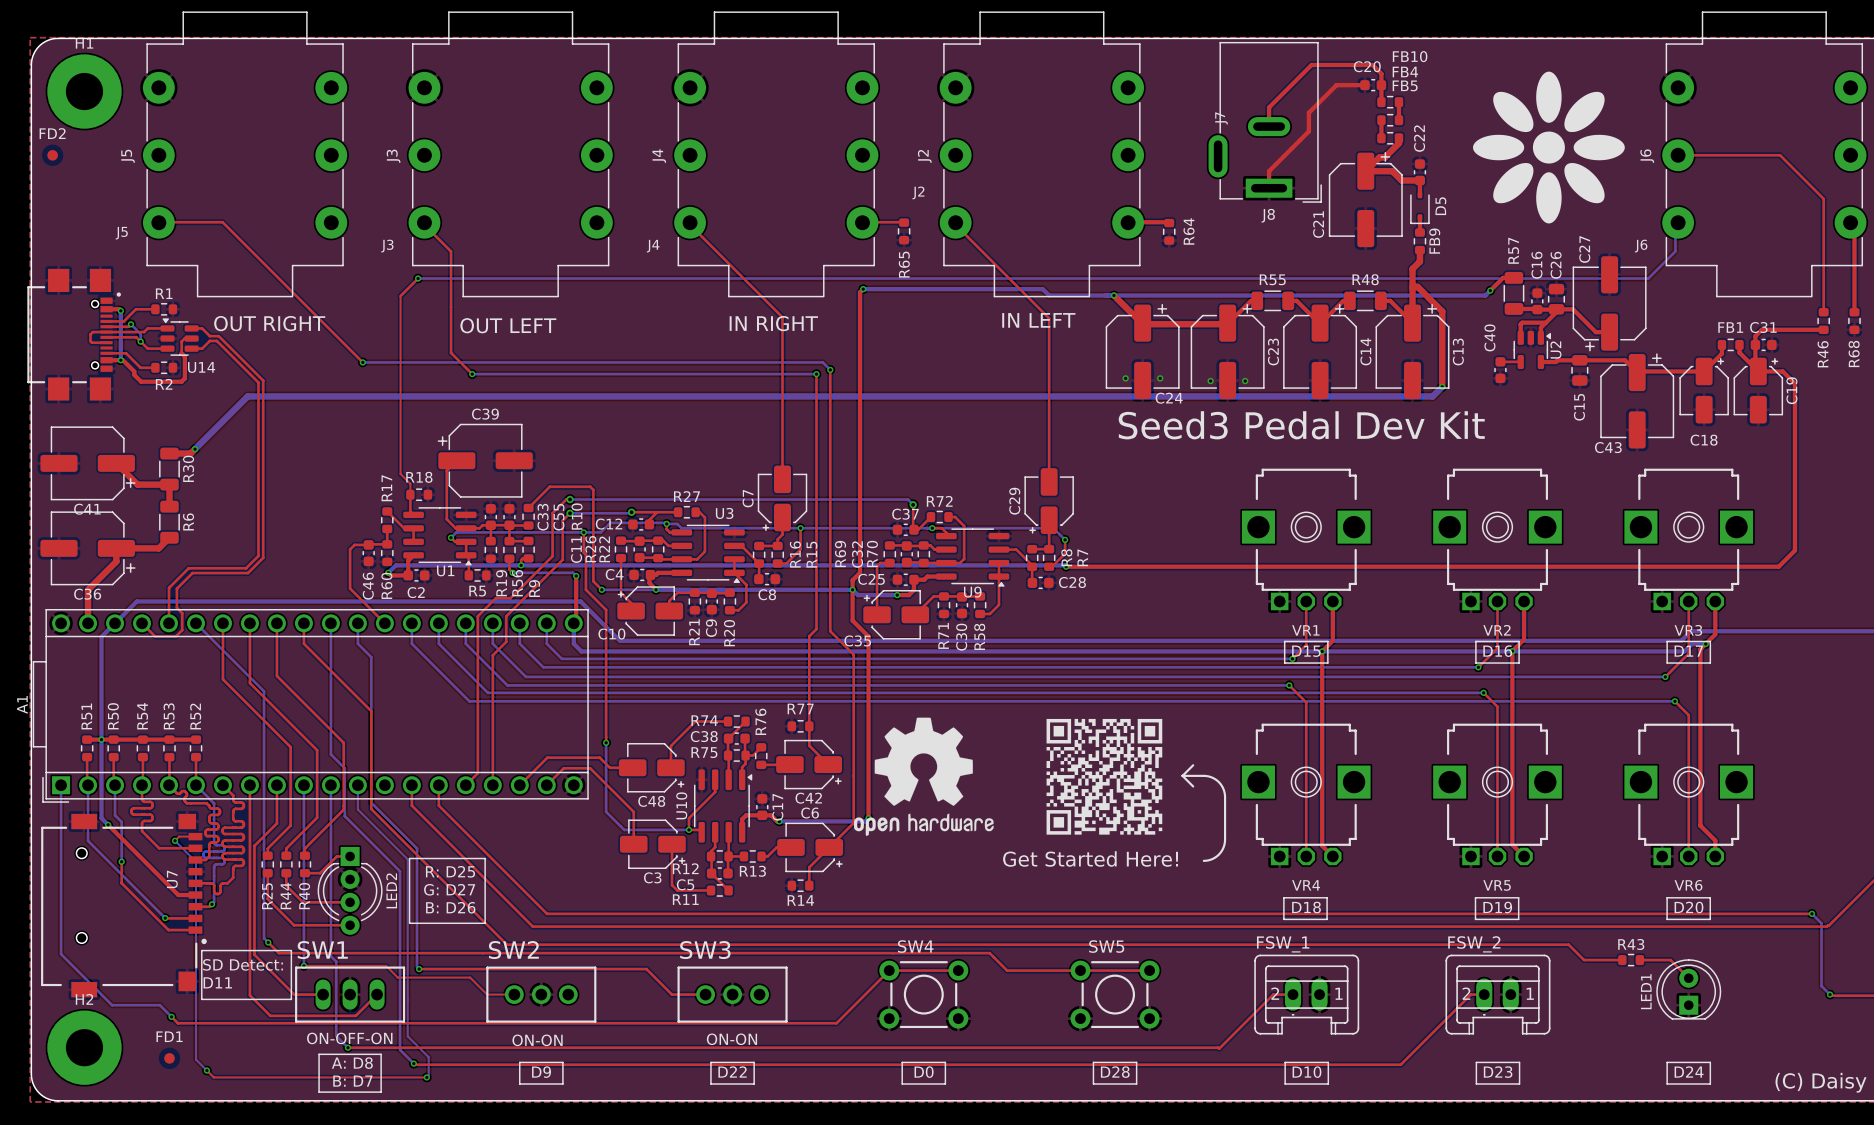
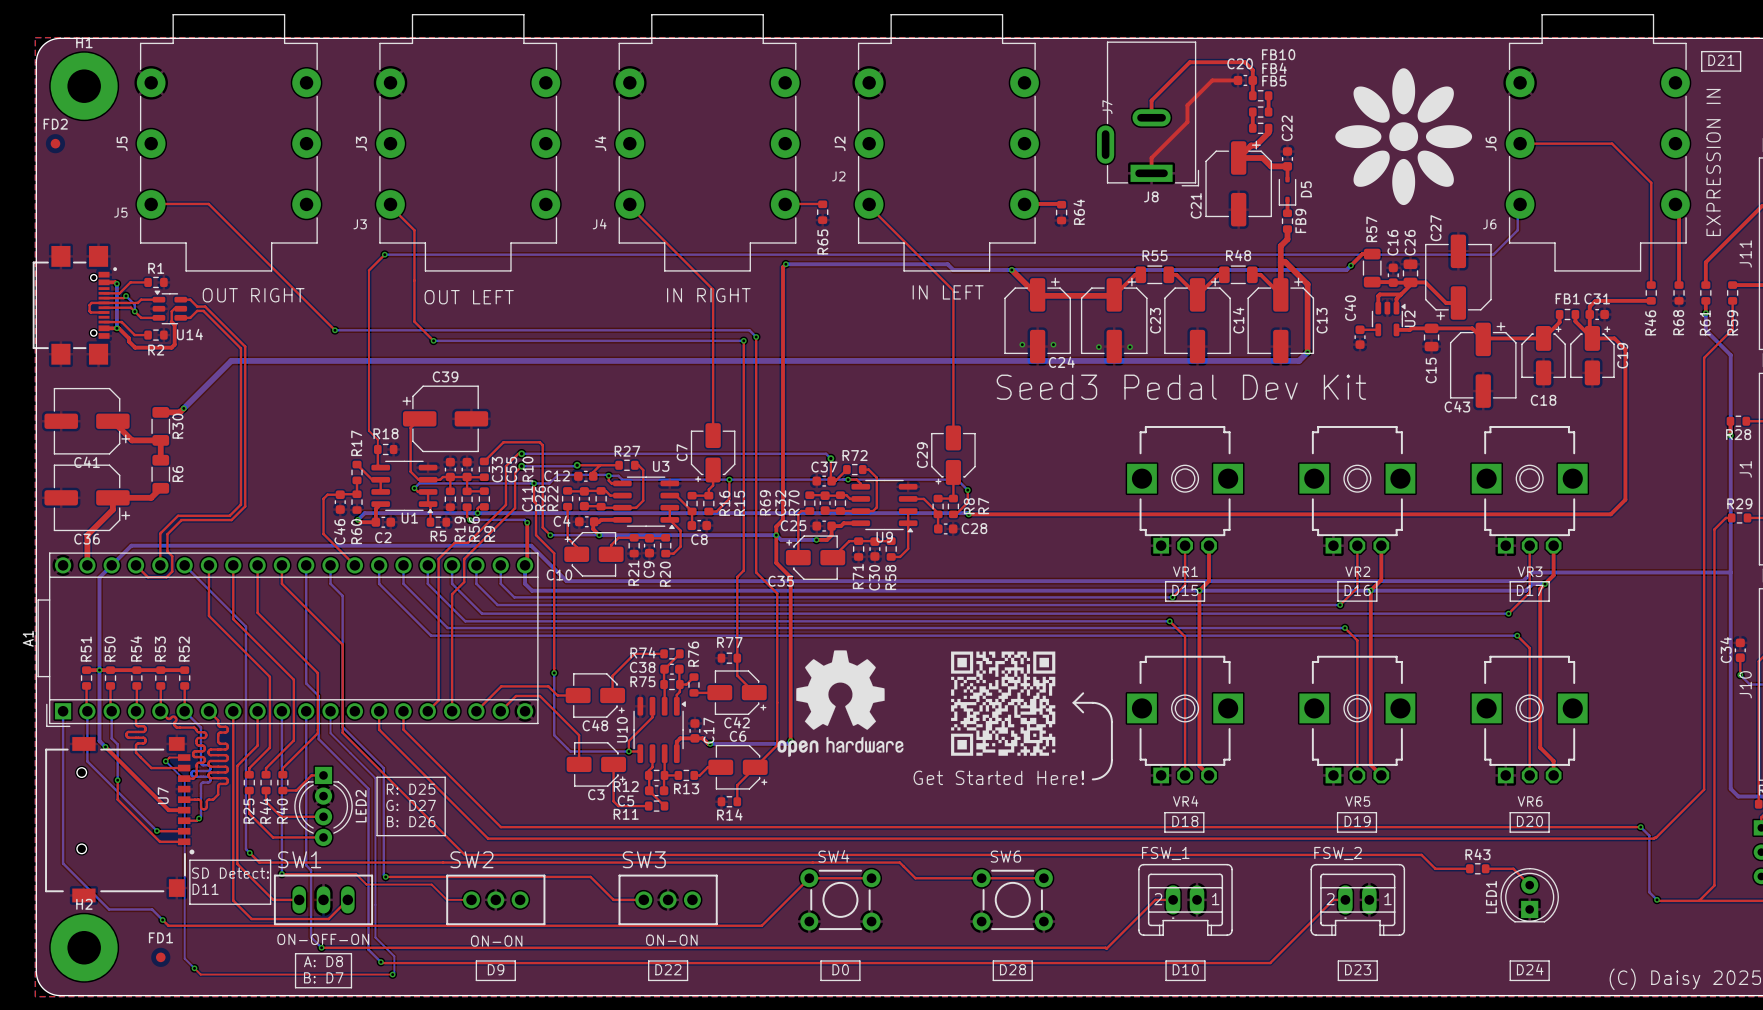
SW5 name: SW5 (1106, 946) -> SW6 (1005, 856)

